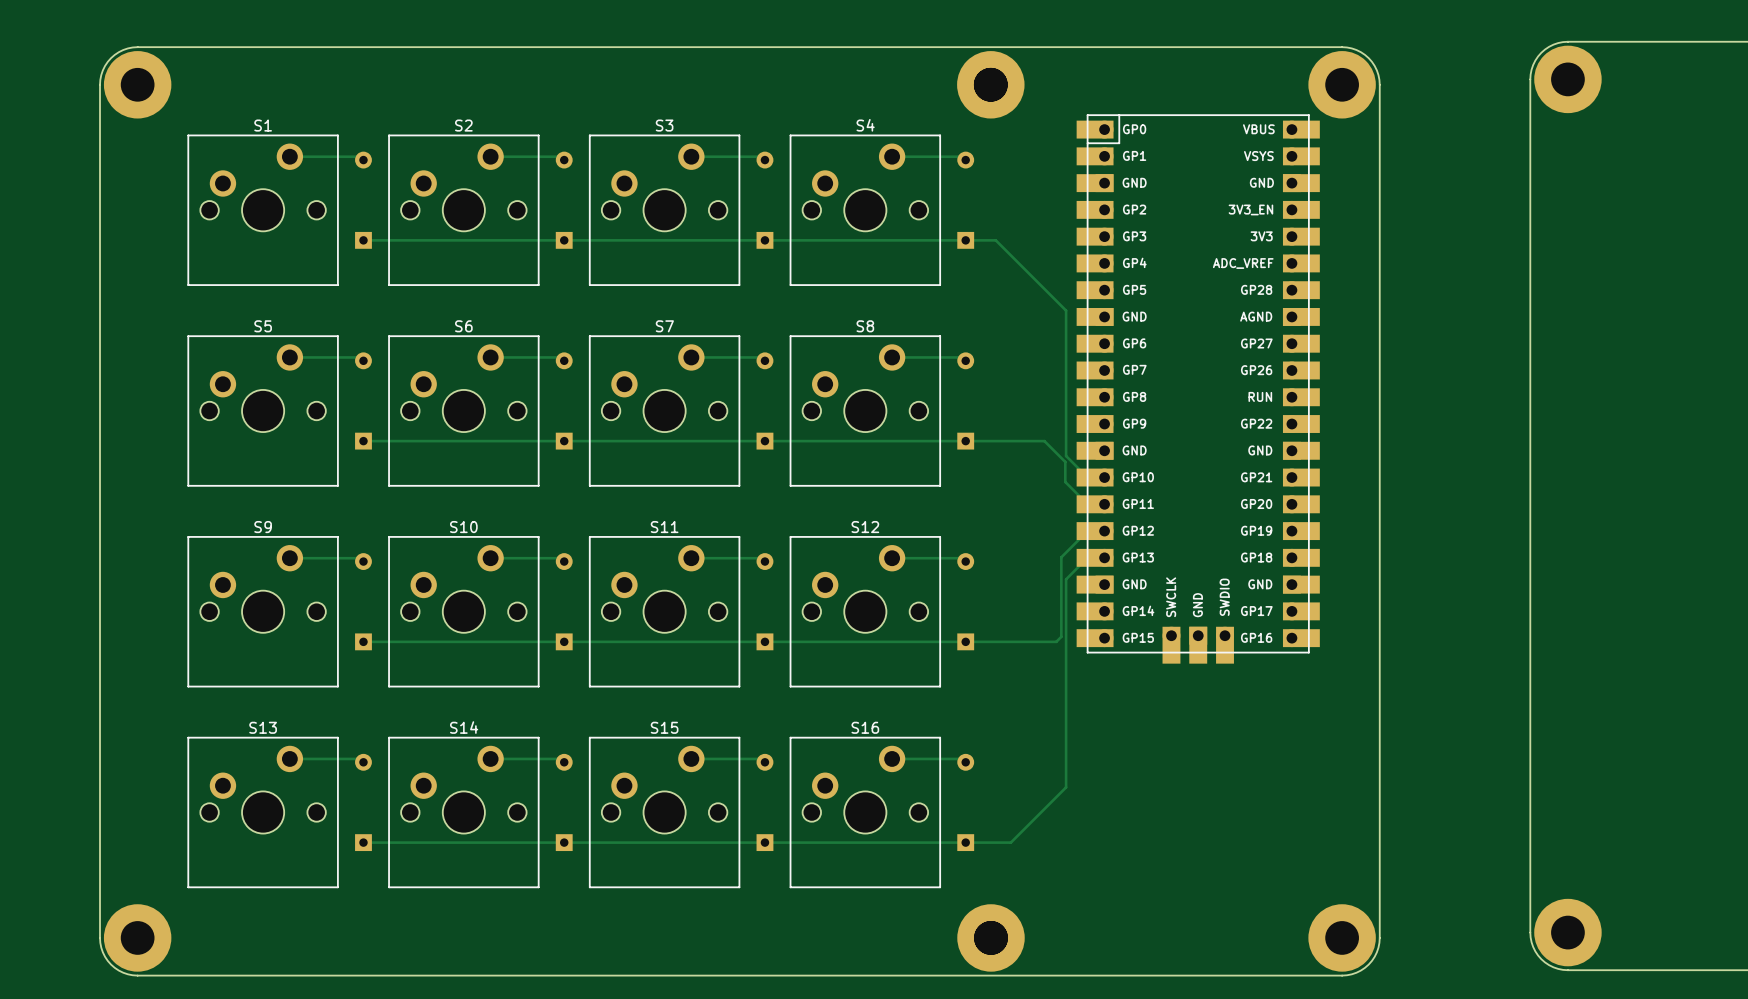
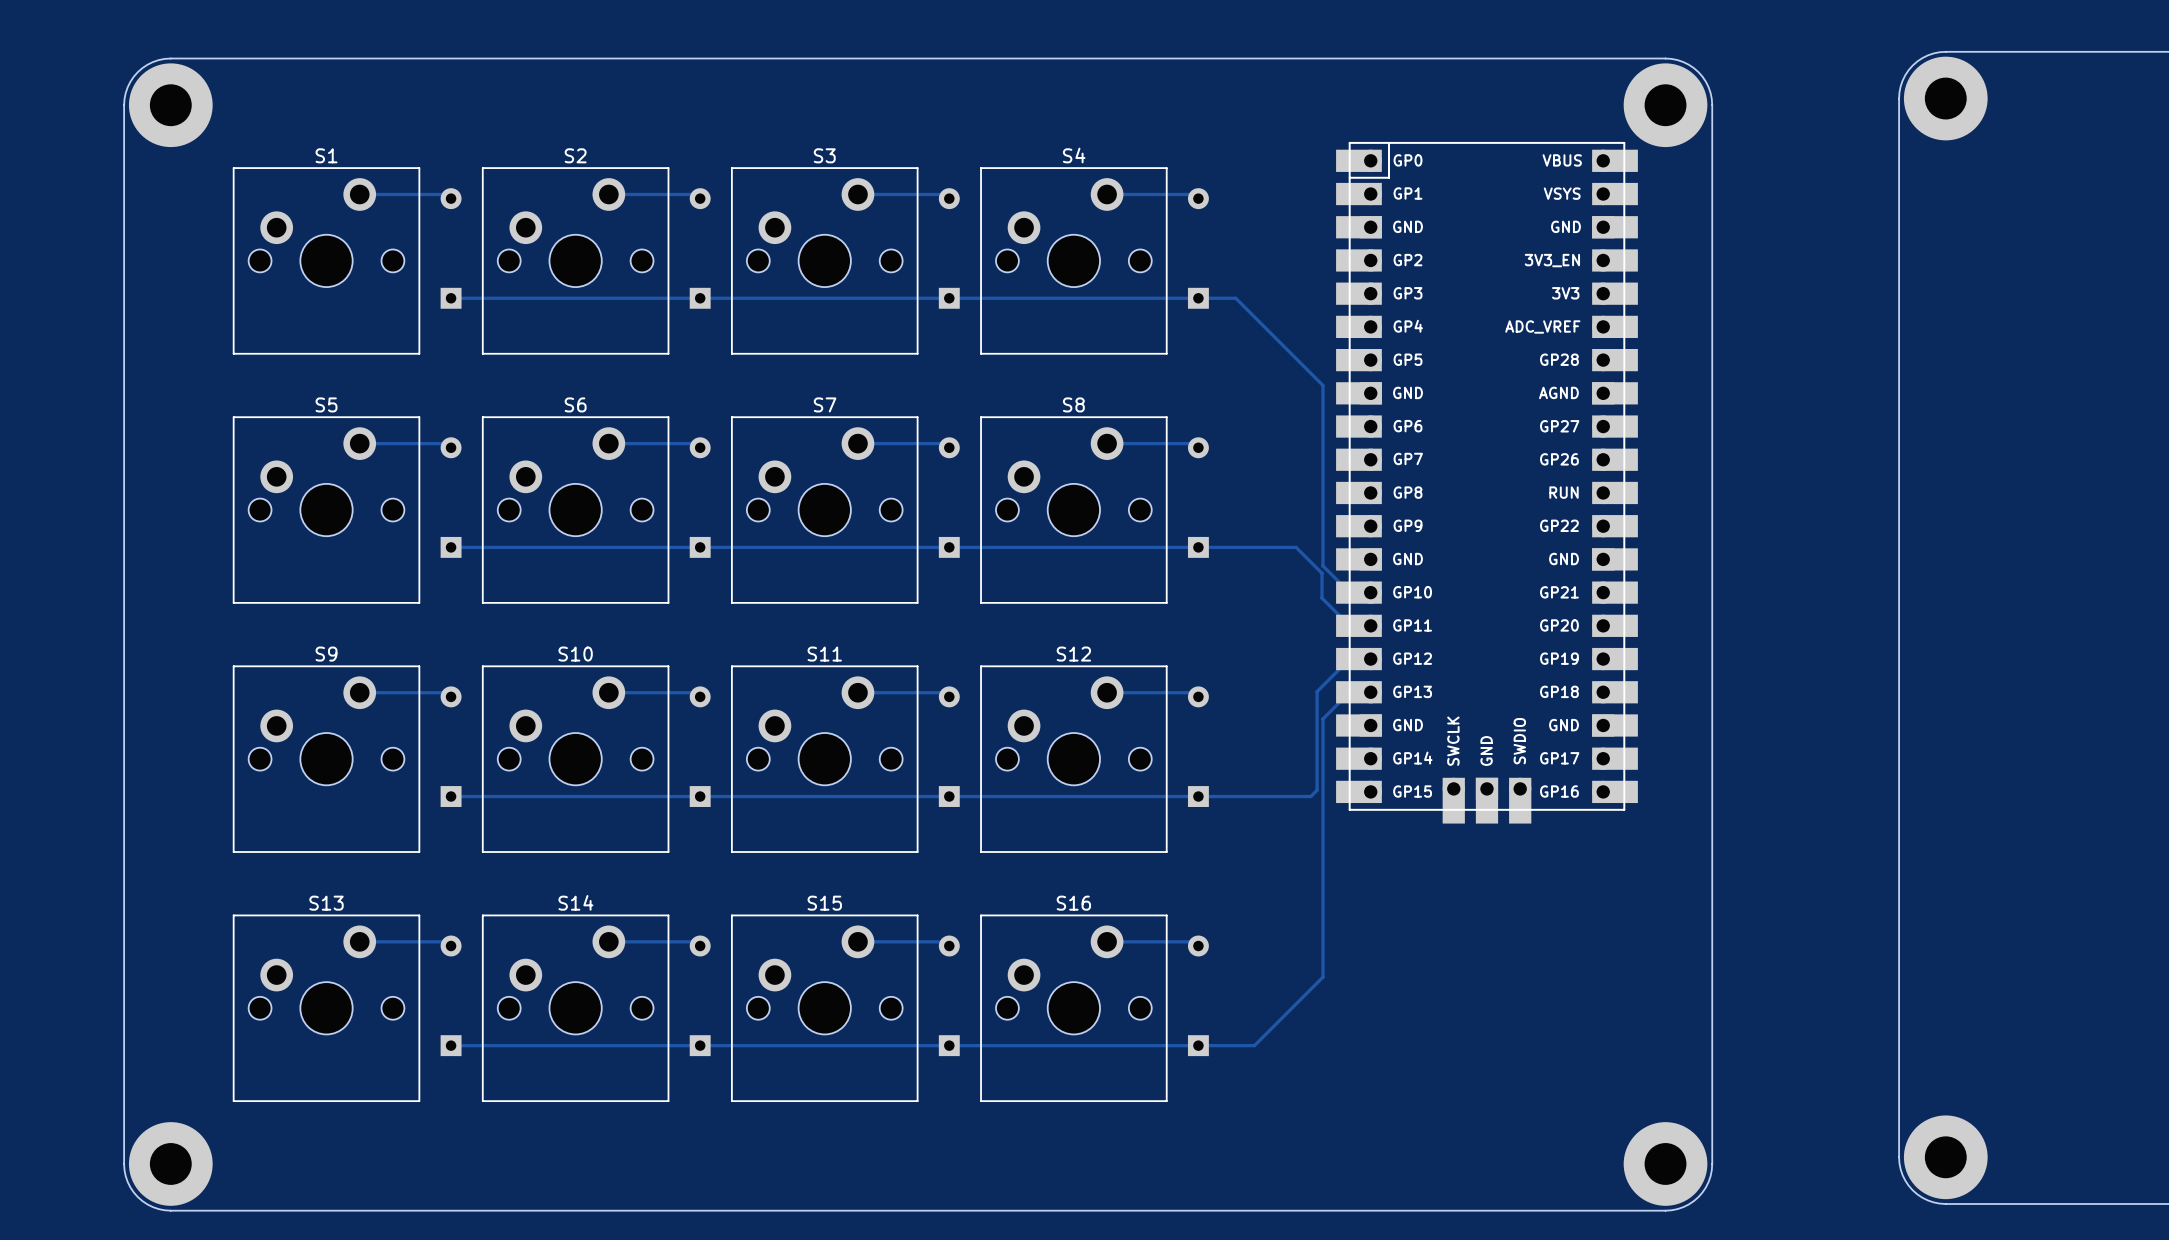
part: (990, 84) -> none
part: (990, 84) -> none
part: (991, 937) -> none
part: (991, 937) -> none

